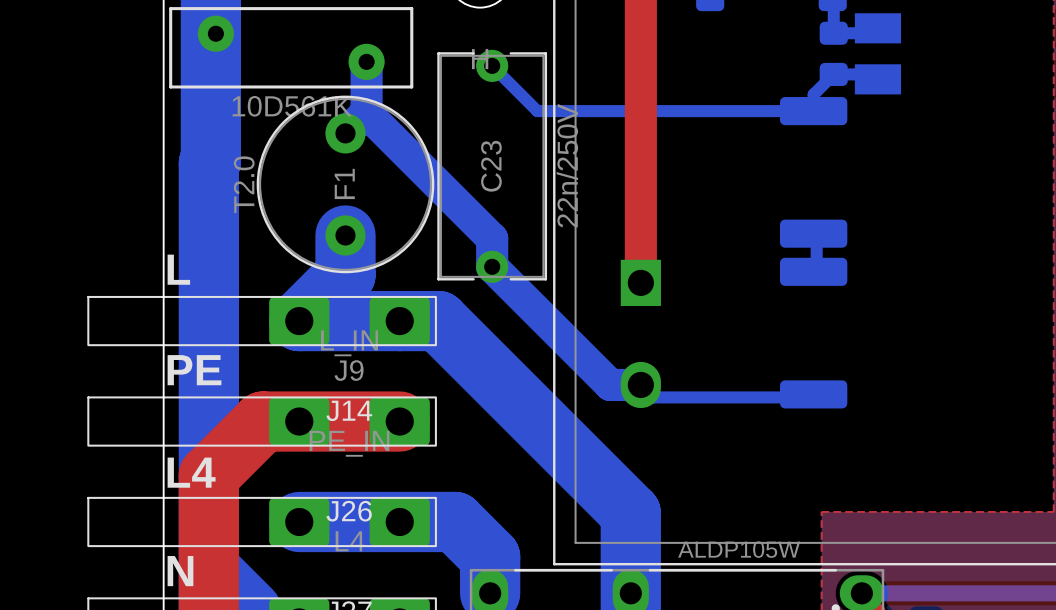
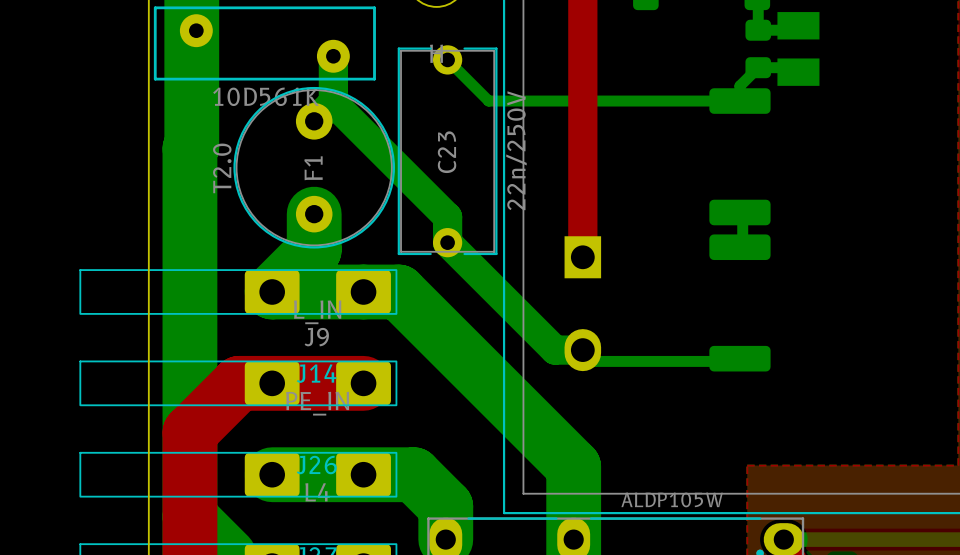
text: L (178, 269) -> none
text: PE (194, 370) -> none
text: L4 (191, 472) -> none
text: N (180, 571) -> none

